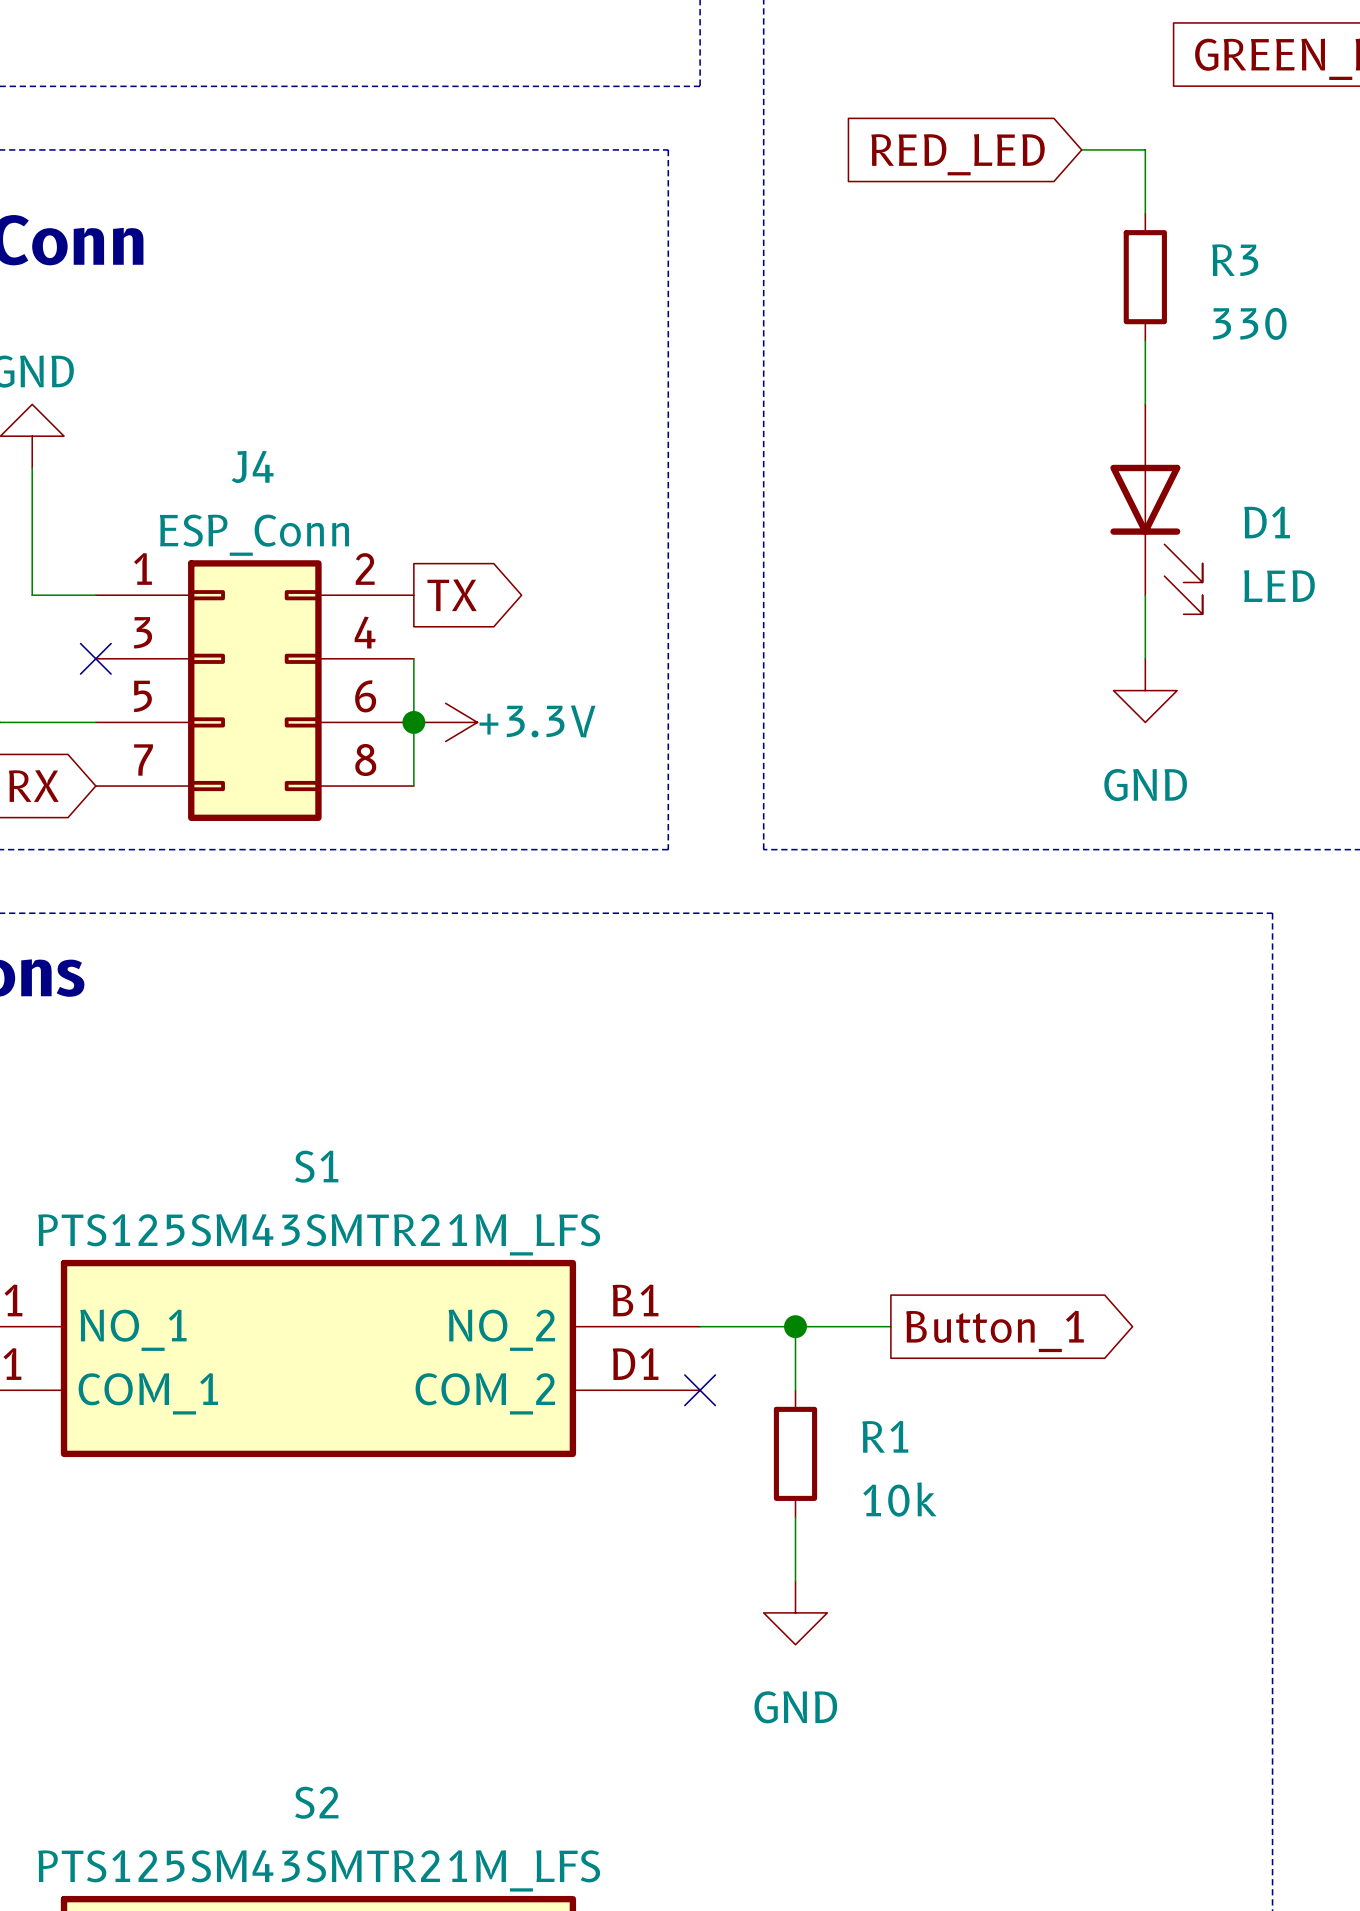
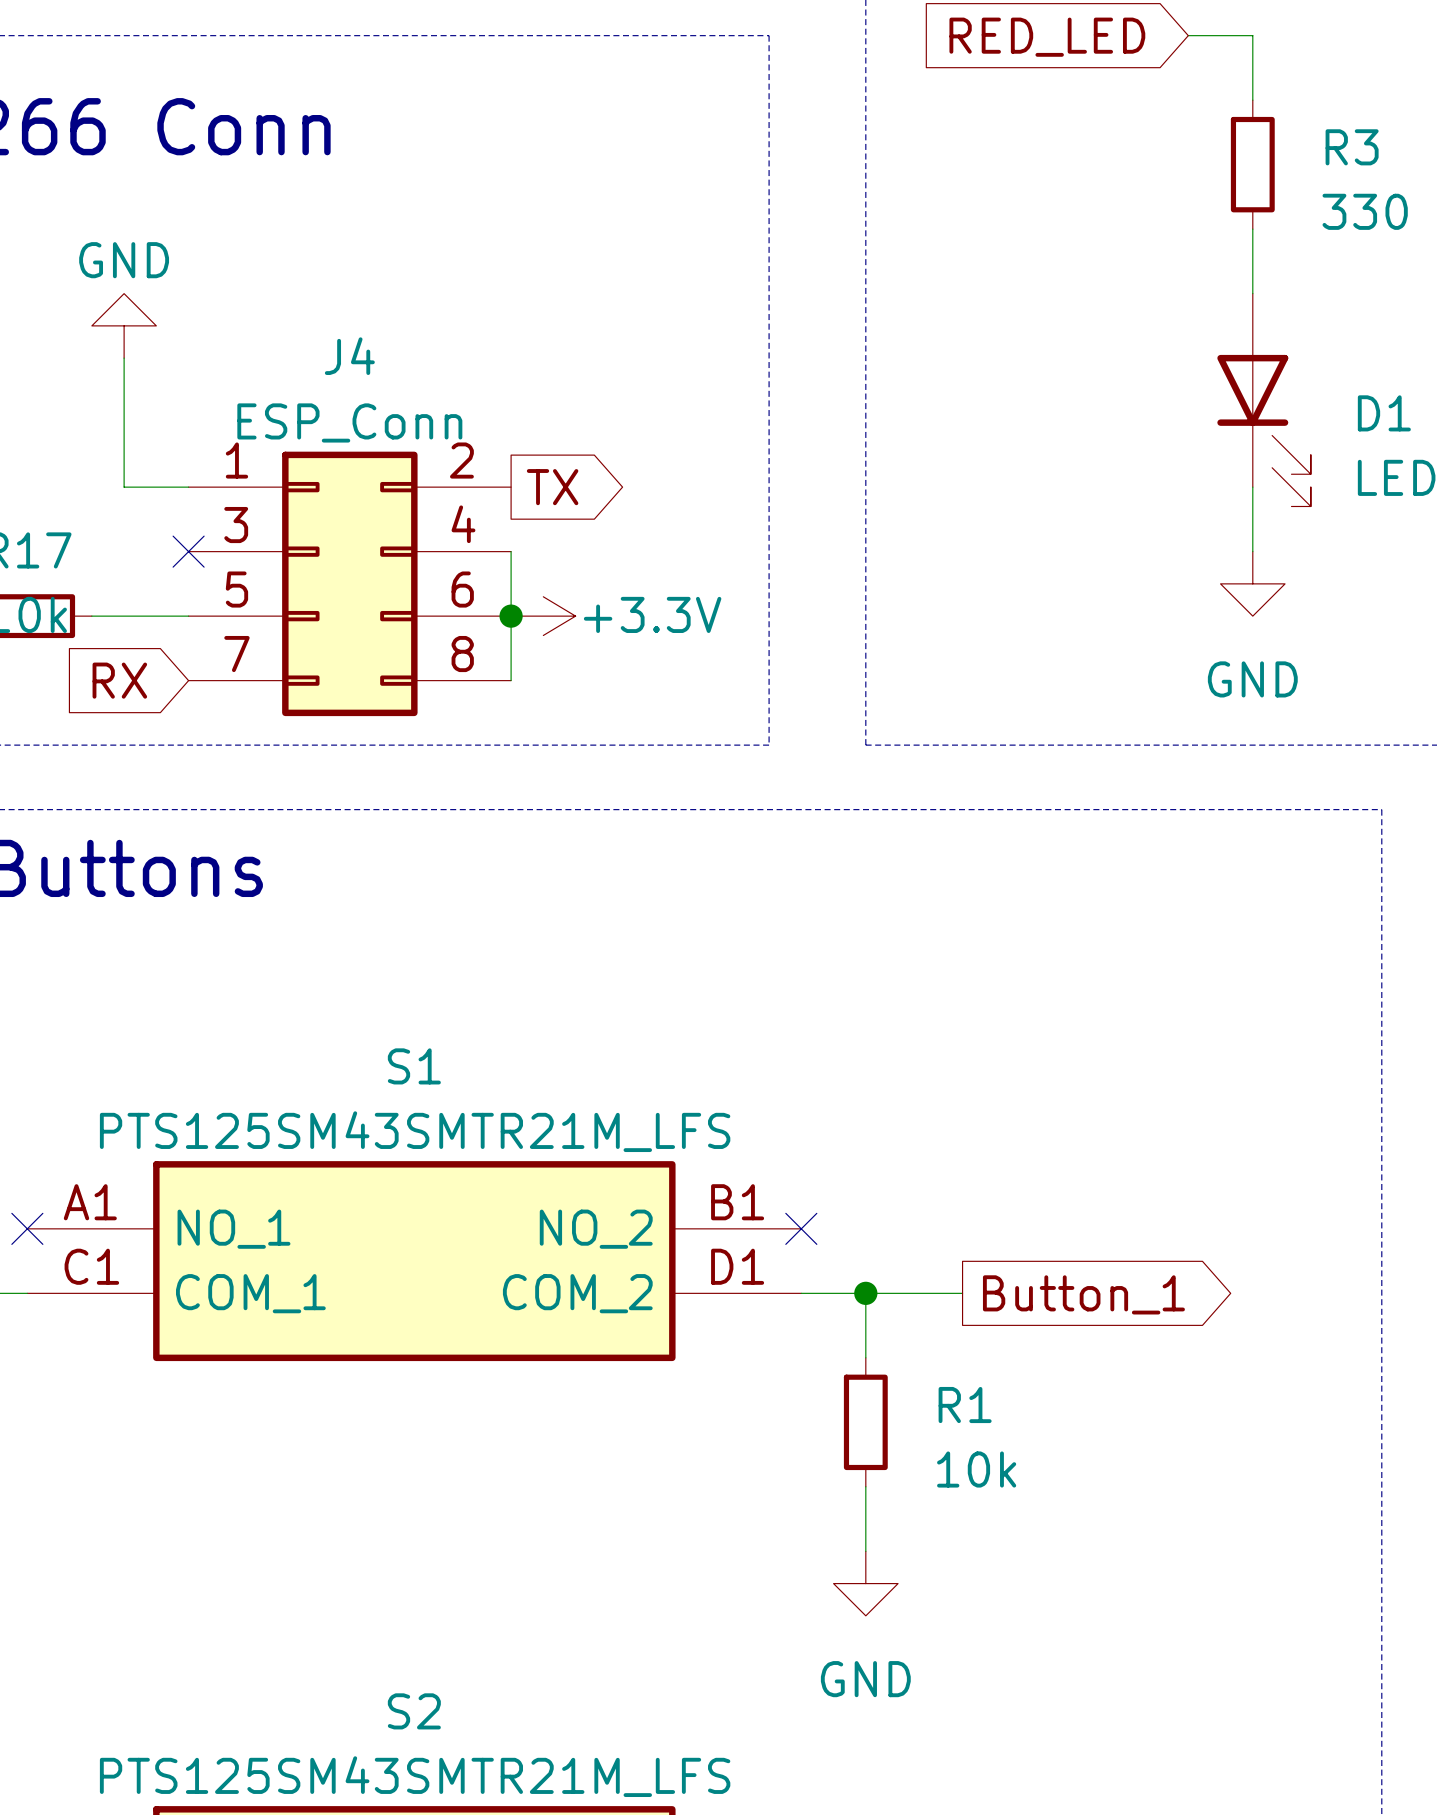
wire: (700, 1326) (890, 1326) -> none
wire: (795, 1326) (795, 1390) -> (865, 1293) (865, 1357)
junction position: (795, 1326) -> (865, 1293)
global label position: Button_1 (995, 1331) -> Button_1 (1083, 1294)
wire: none -> (801, 1293) (962, 1293)
no-connect mark position: (700, 1390) -> (801, 1228)
R1 position: (795, 1453) -> (865, 1422)
wire: (795, 1517) (795, 1581) -> (865, 1486) (865, 1551)
power symbol position: GND (795, 1612) -> GND (865, 1583)

